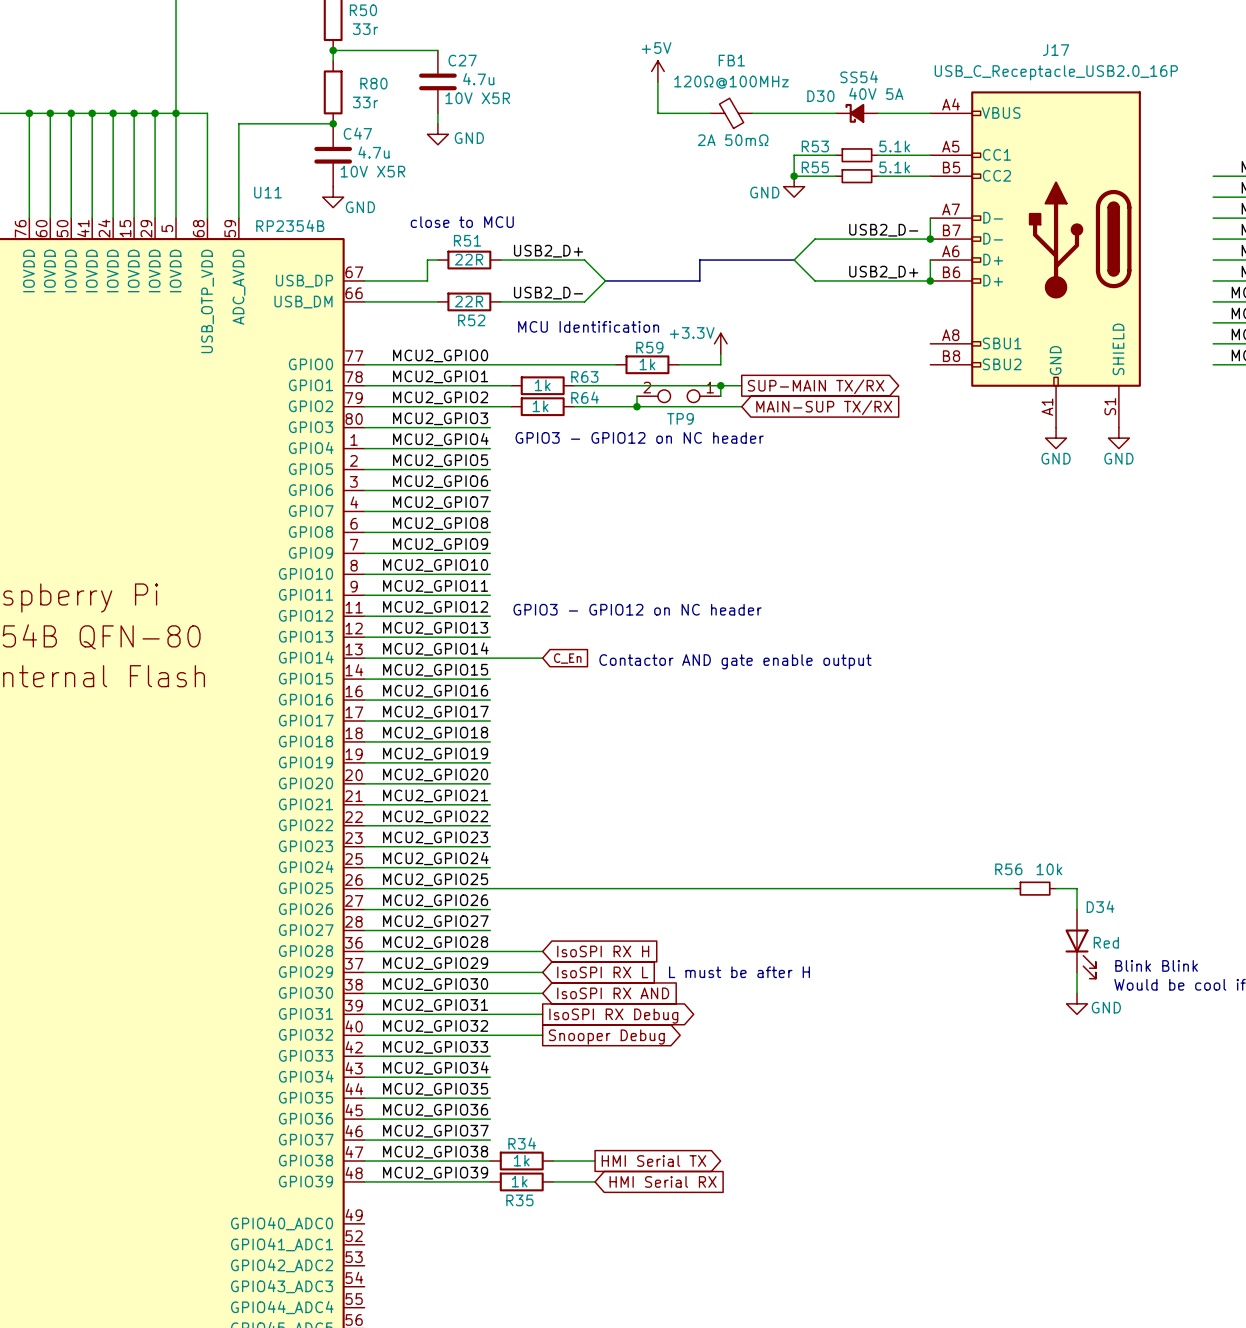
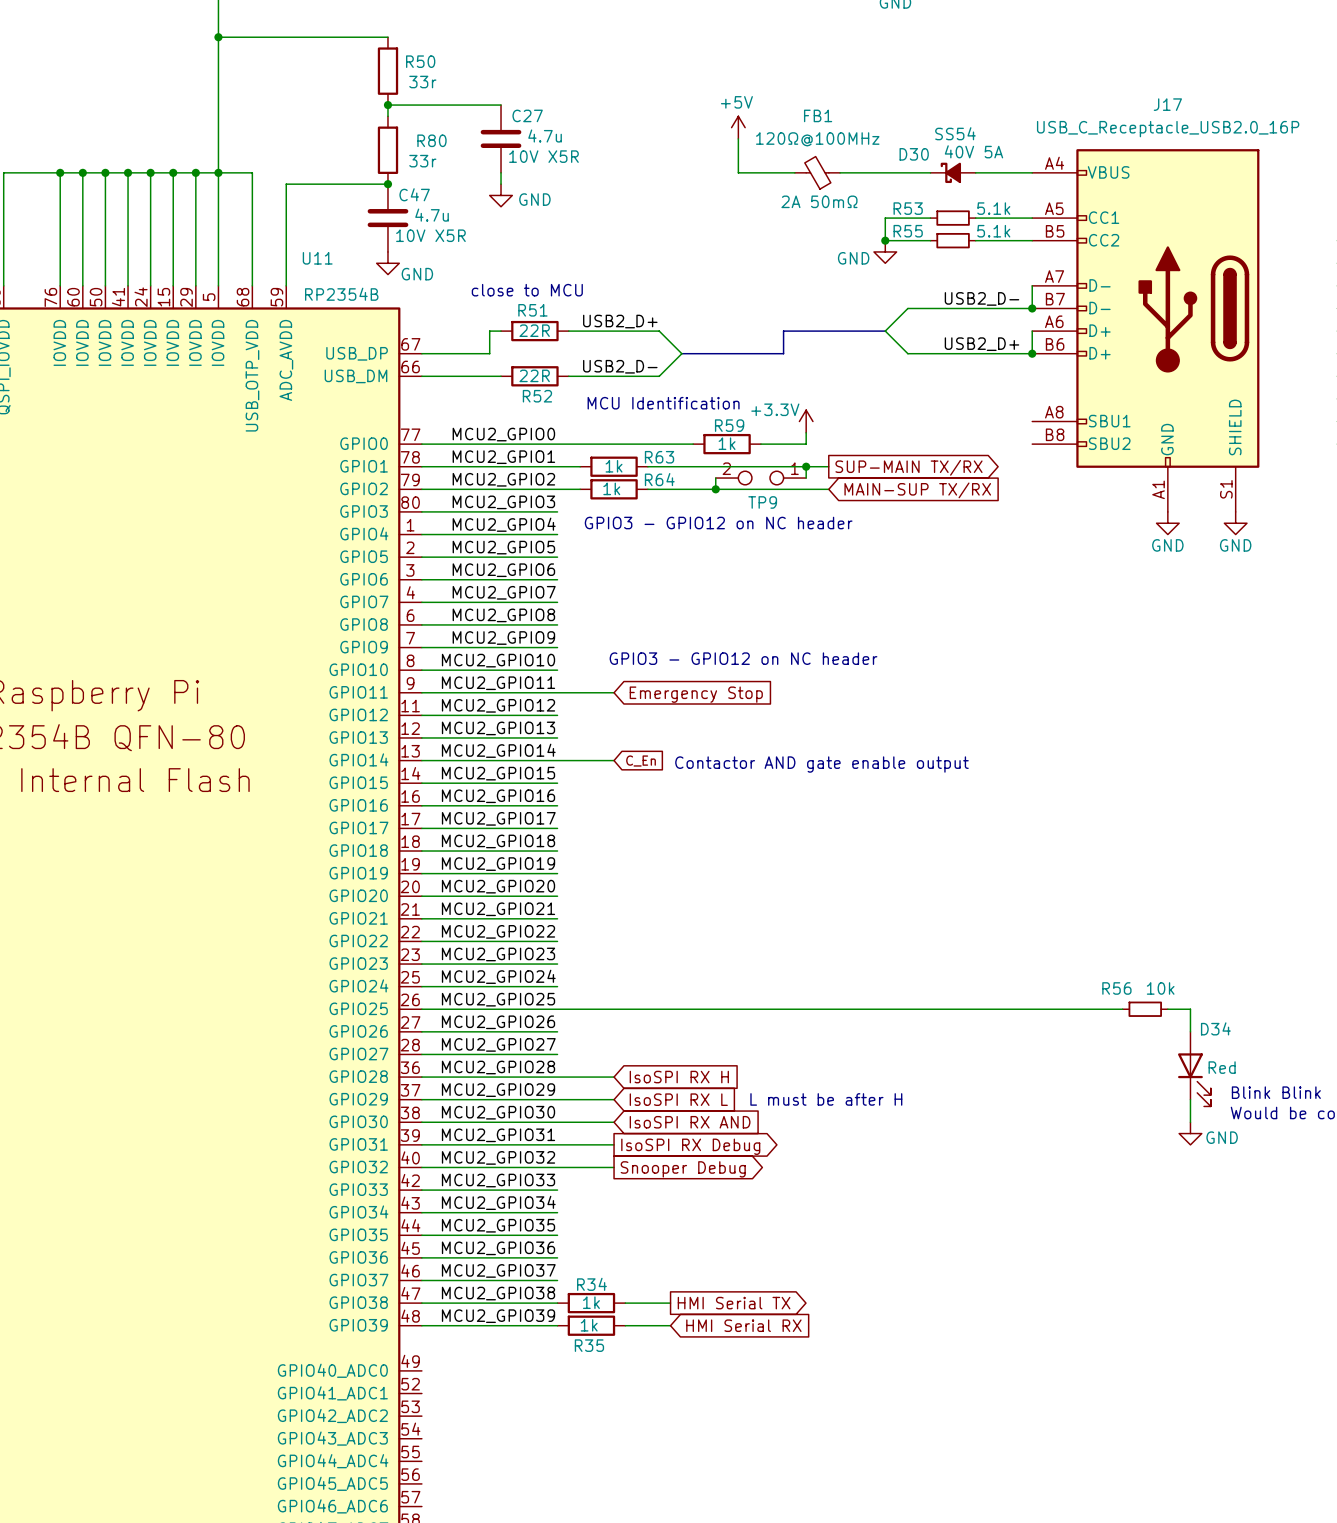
wire: none -> (557, 692) (614, 692)
global label: none -> Emergency Stop (696, 694)
text position: GPIO3 - GPIO12 on NC header (637, 609) -> GPIO3 - GPIO12 on NC header (743, 658)

